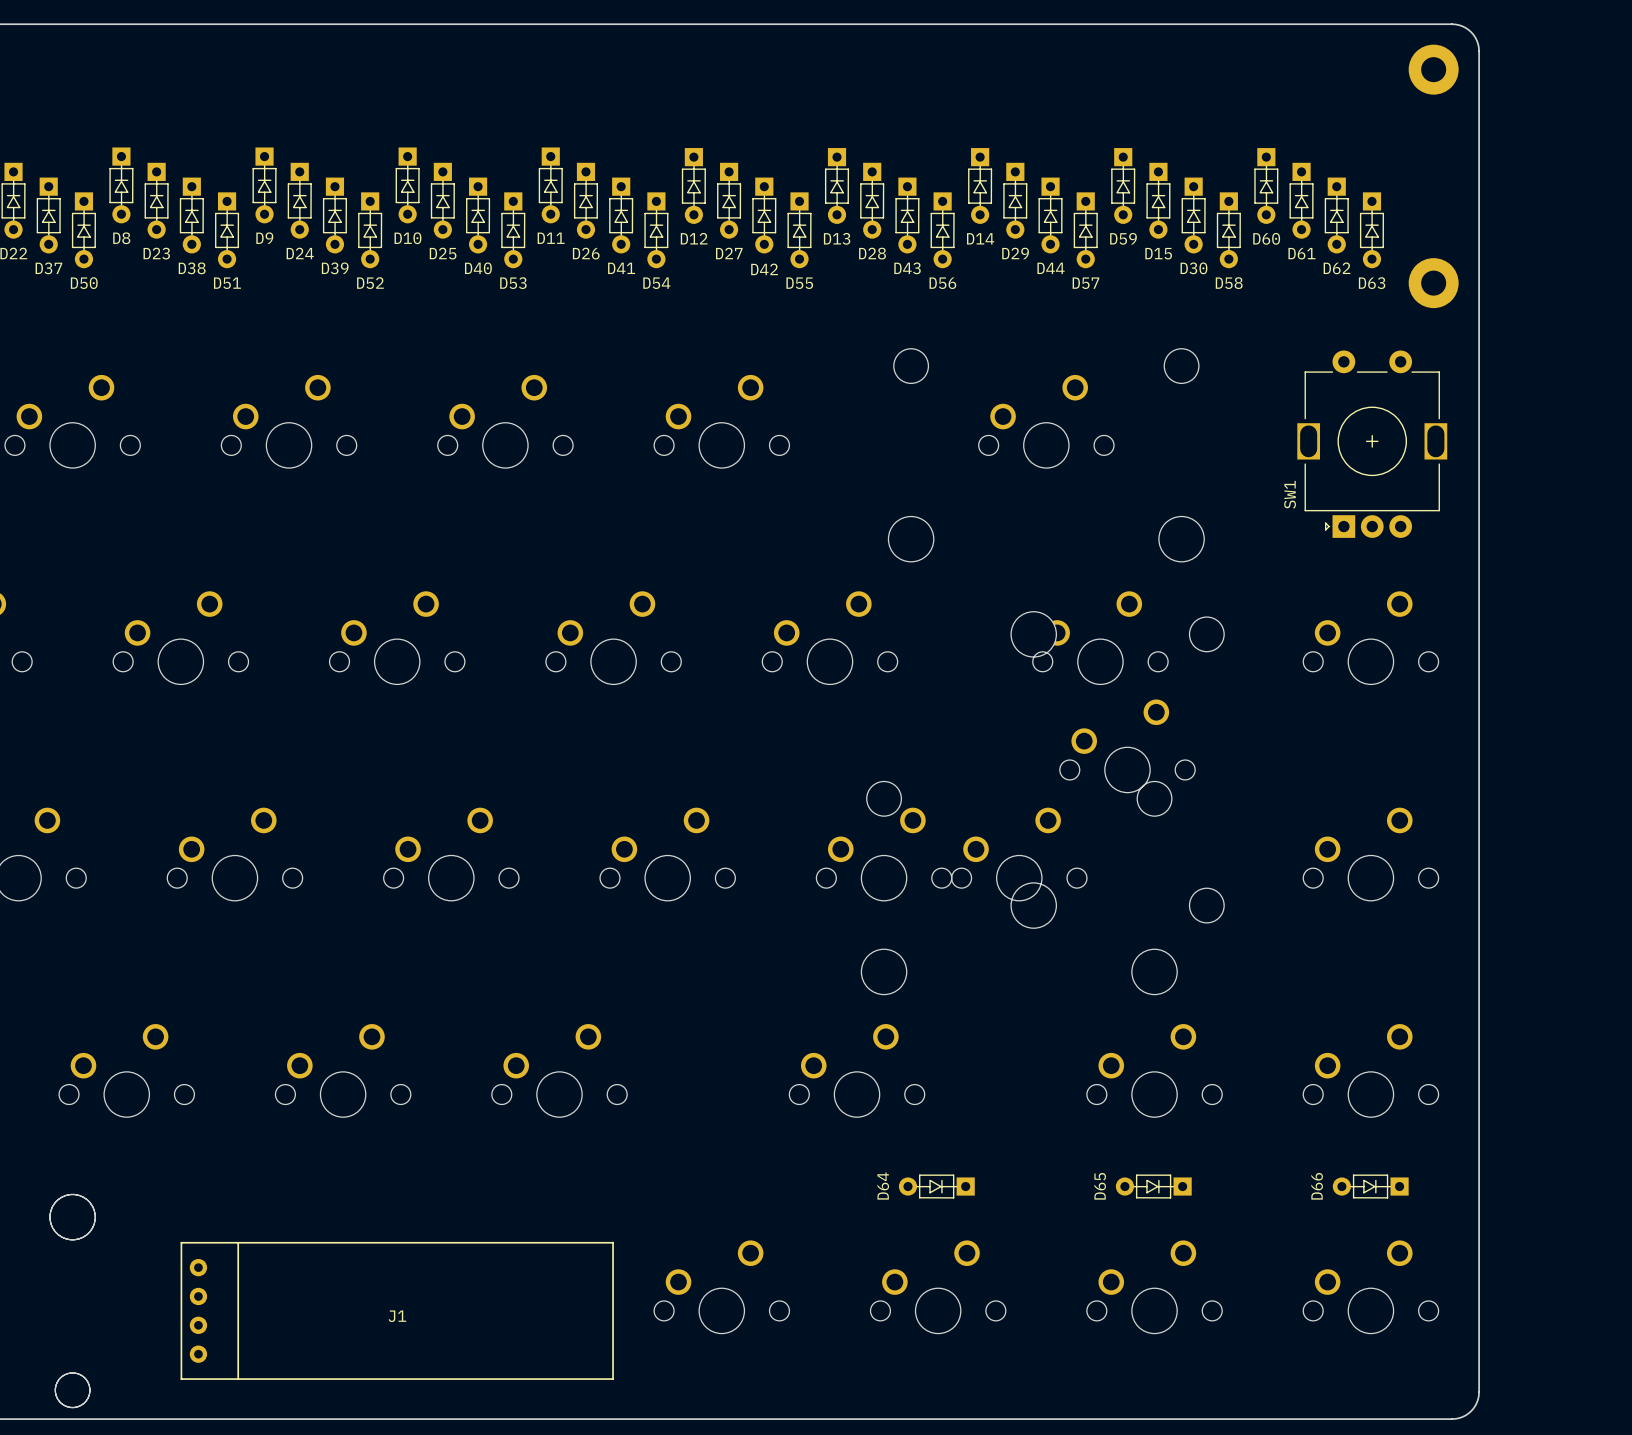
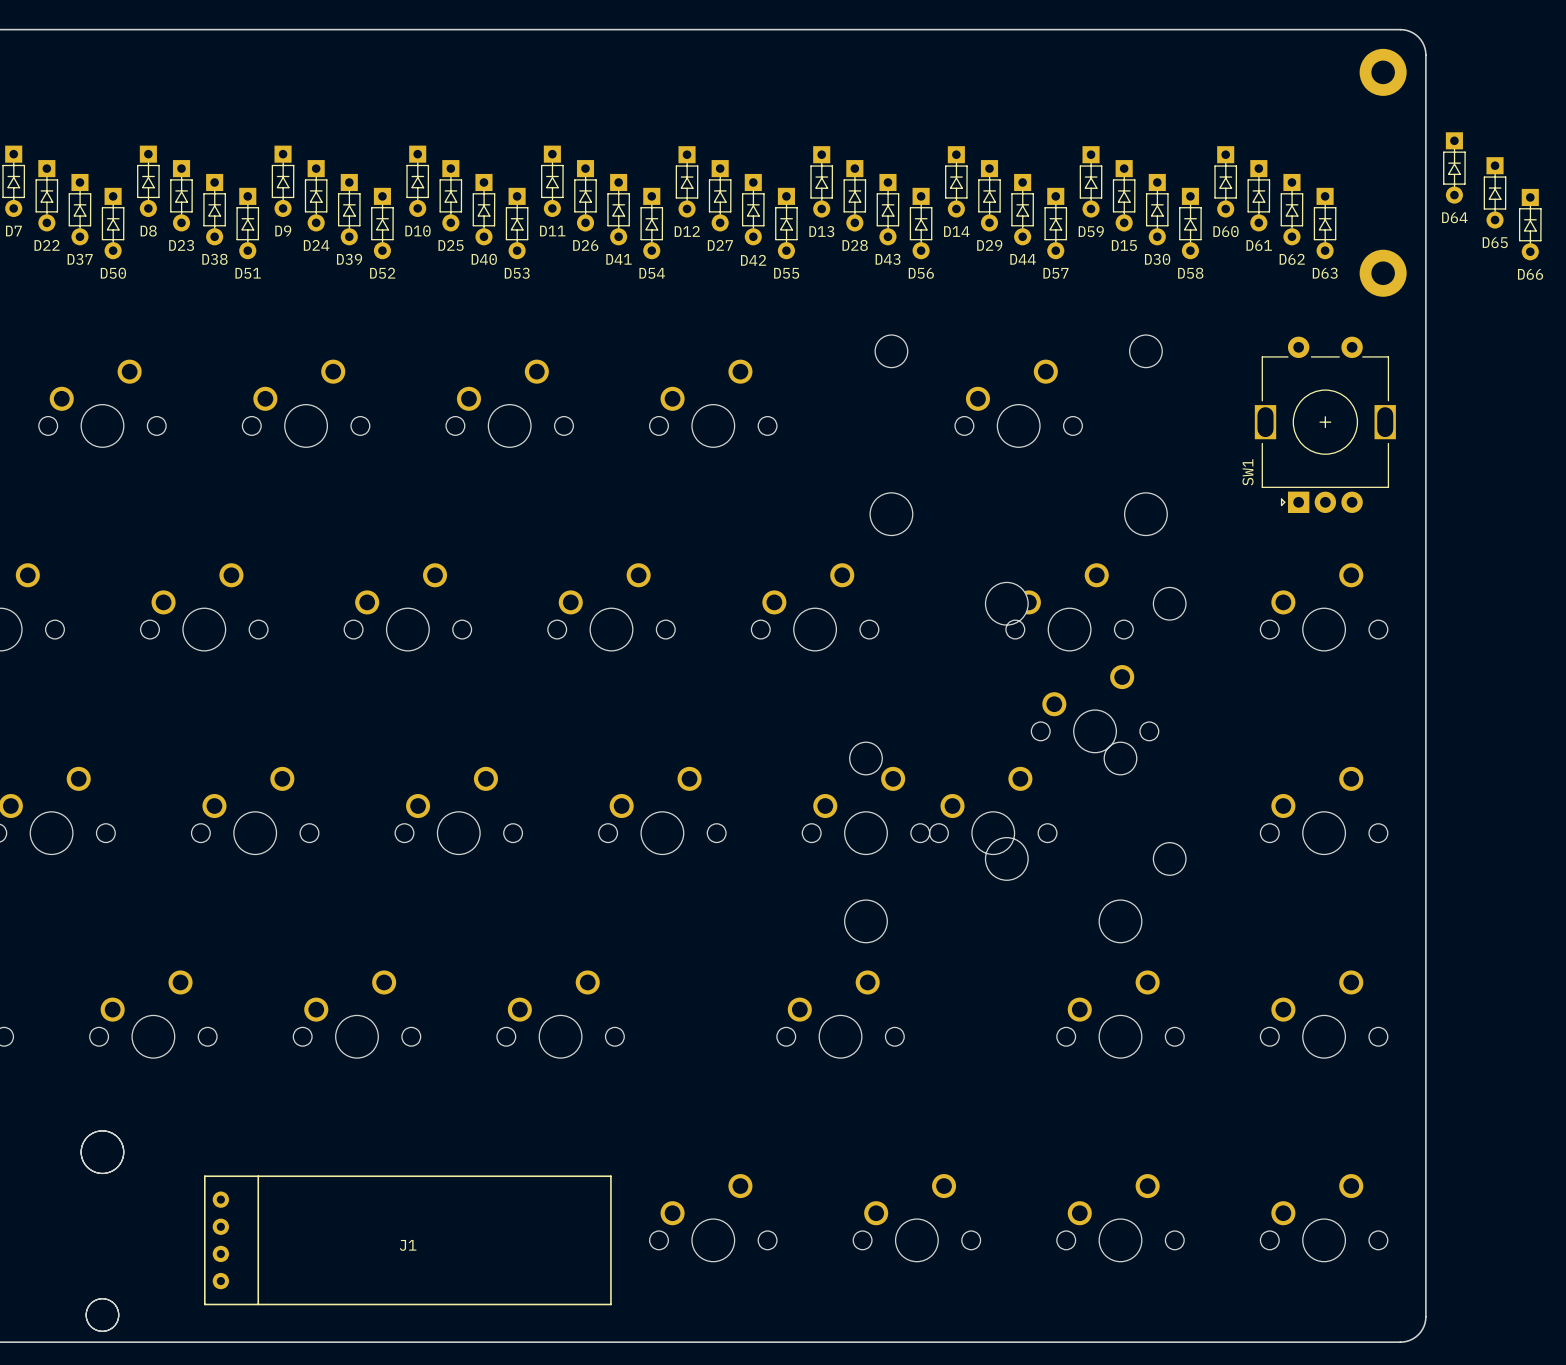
D64 rotation: 0° (936, 1186) -> 90° counterclockwise (1454, 167)
D64 position: (936, 1186) -> (1454, 167)
D65 rotation: 0° (1153, 1186) -> 90° counterclockwise (1495, 192)
D65 position: (1153, 1186) -> (1495, 192)
D66 rotation: 0° (1370, 1186) -> 90° counterclockwise (1530, 224)
D66 position: (1370, 1186) -> (1530, 224)

